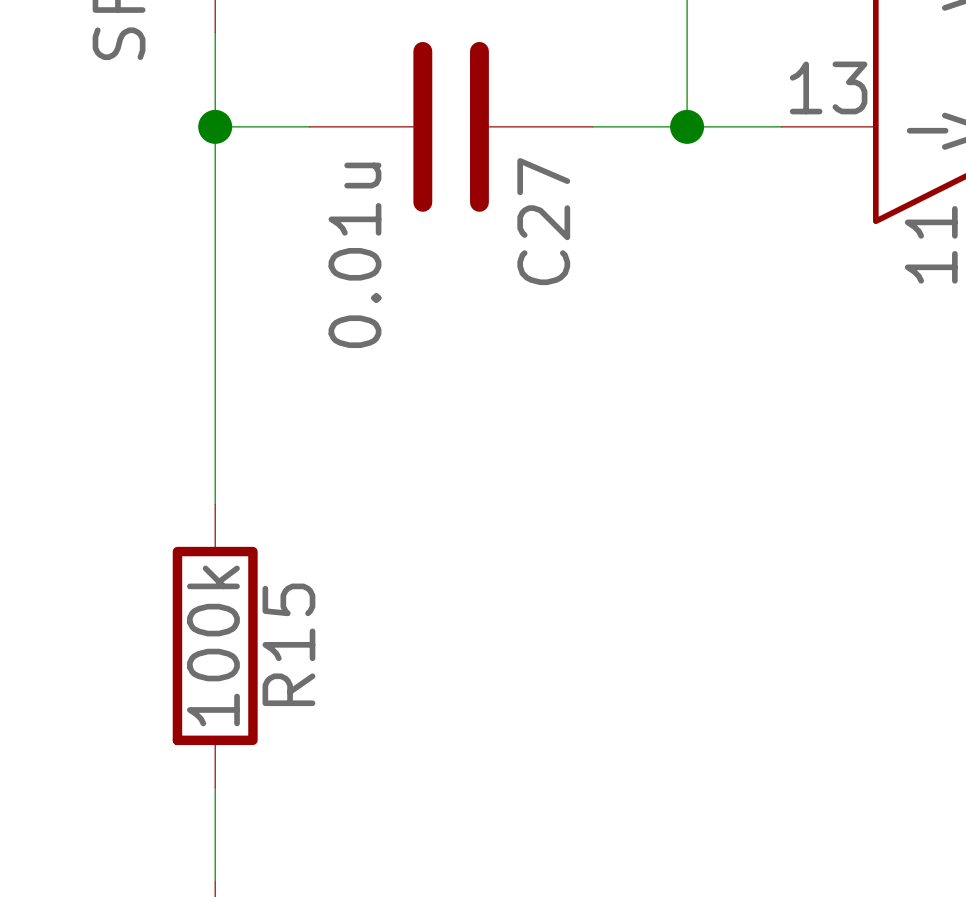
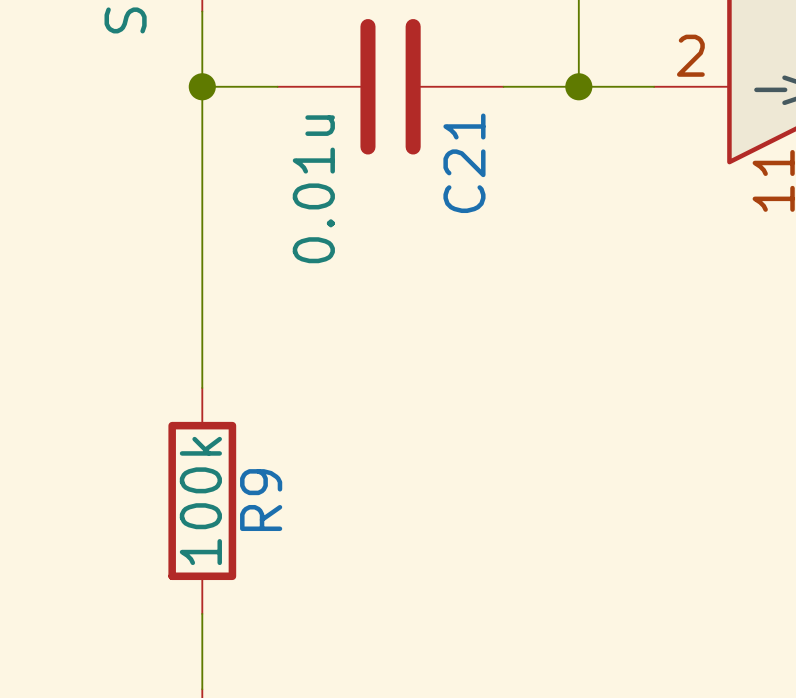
part pin number: 13 (828, 87) -> 2 (690, 55)
C27 name: C27 (543, 221) -> C21 (464, 163)
R15 name: R15 (288, 644) -> R9 (261, 500)

